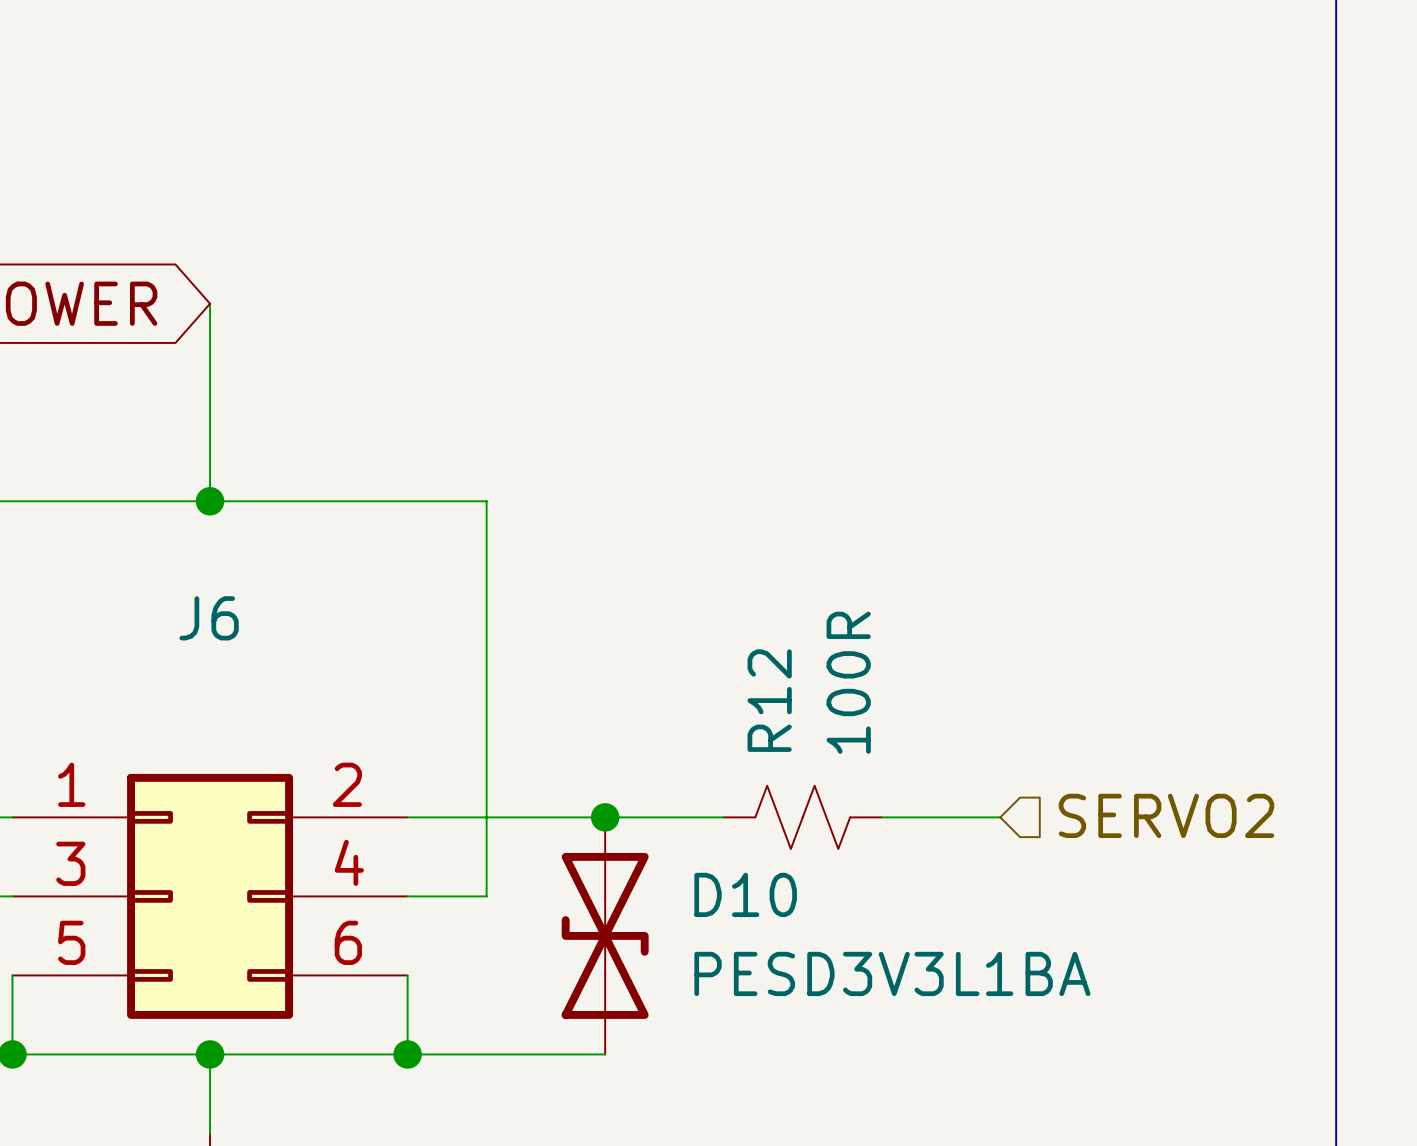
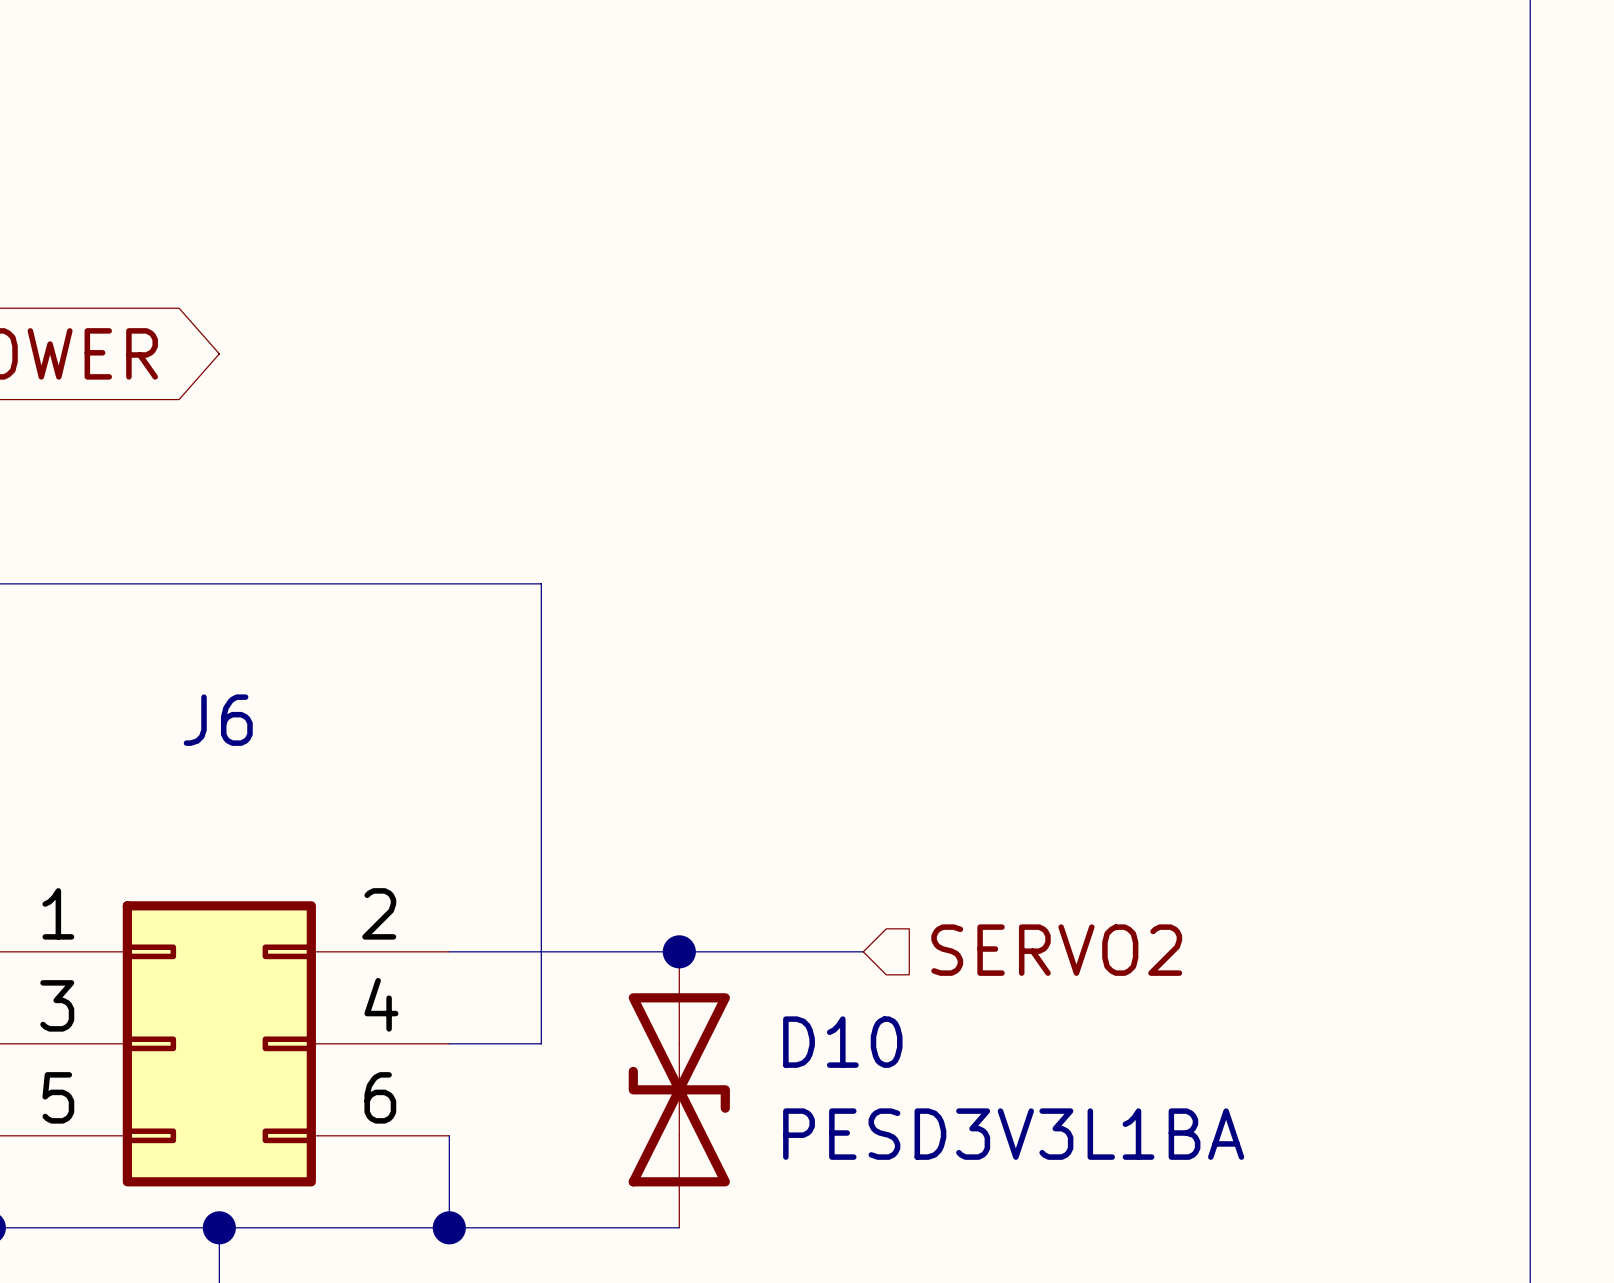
wire: (210, 303) (210, 501) -> none
junction: (210, 501) -> none
hierarchical label position: SERVO2 (1166, 815) -> SERVO2 (1056, 950)
R12: 100R (802, 817) -> none
wire: (881, 817) (1000, 817) -> none

